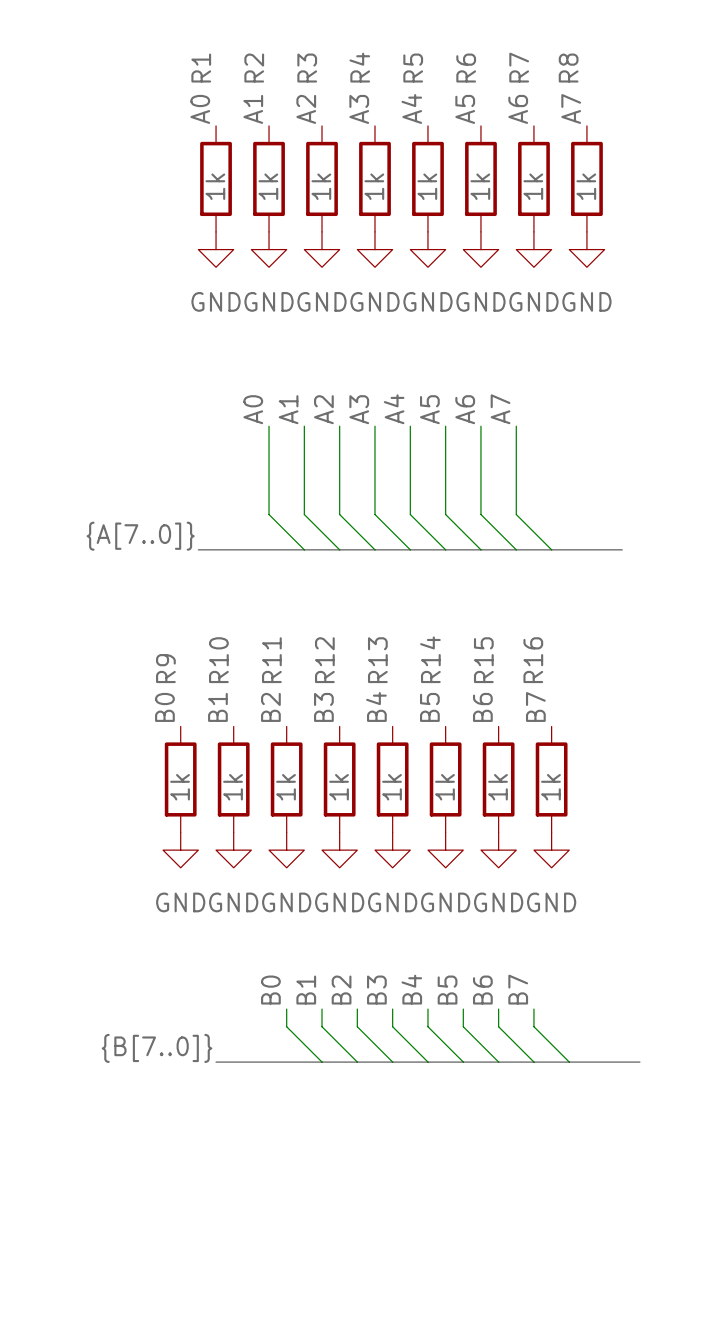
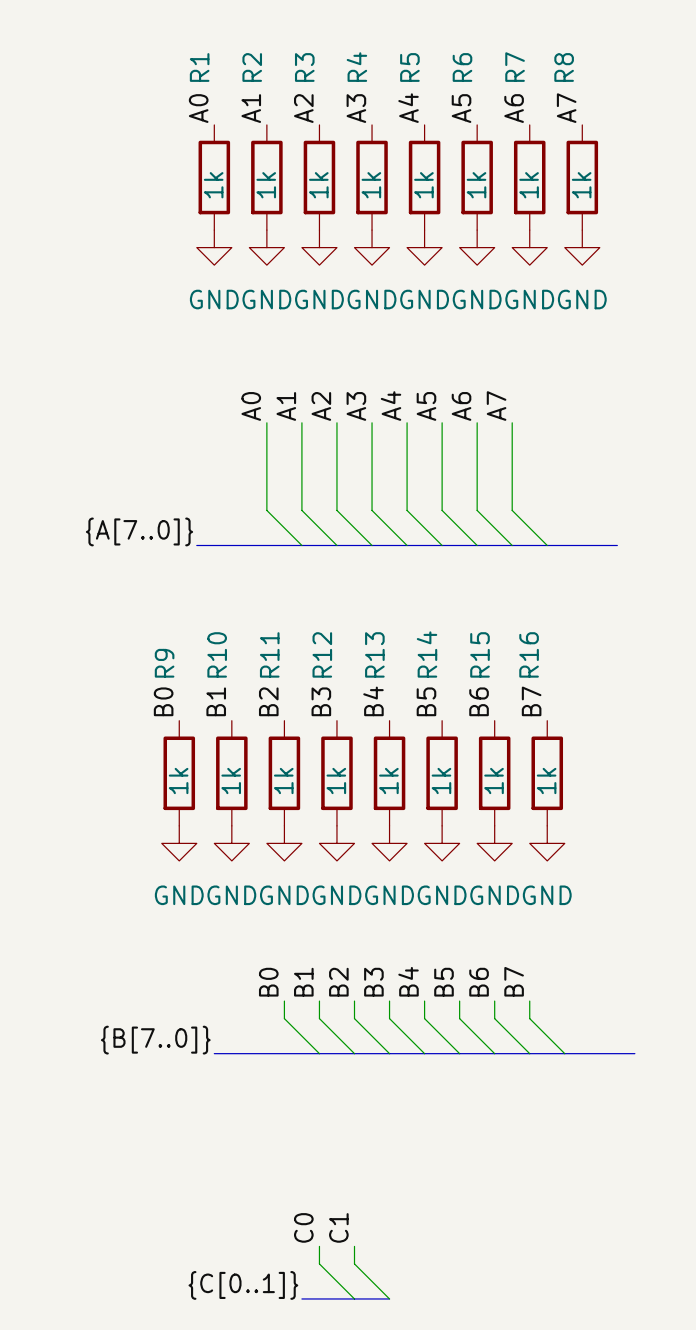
label: none -> C0 (303, 1227)
label: none -> C1 (338, 1227)
wire: none -> (319, 1246) (319, 1263) (354, 1298)
wire: none -> (354, 1246) (354, 1263) (389, 1298)
label: none -> {C[0..1]} (243, 1285)
bus: none -> (301, 1298) (389, 1298)

